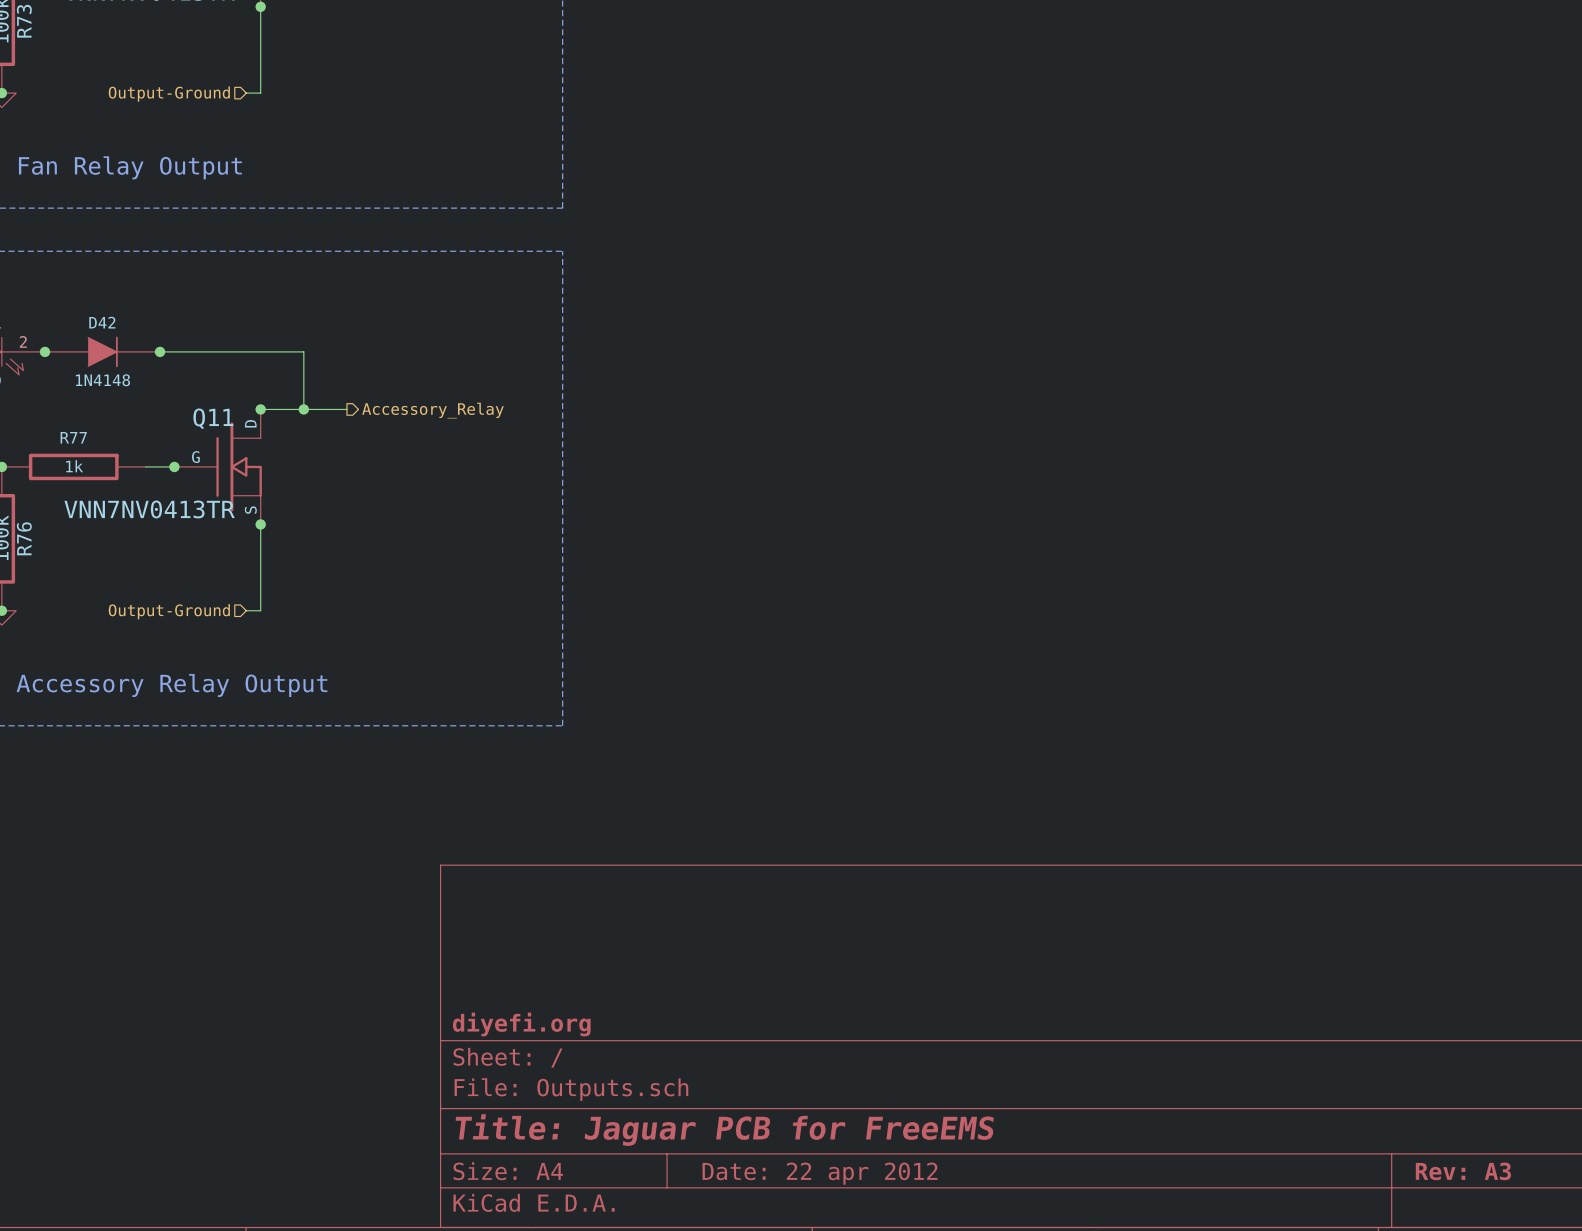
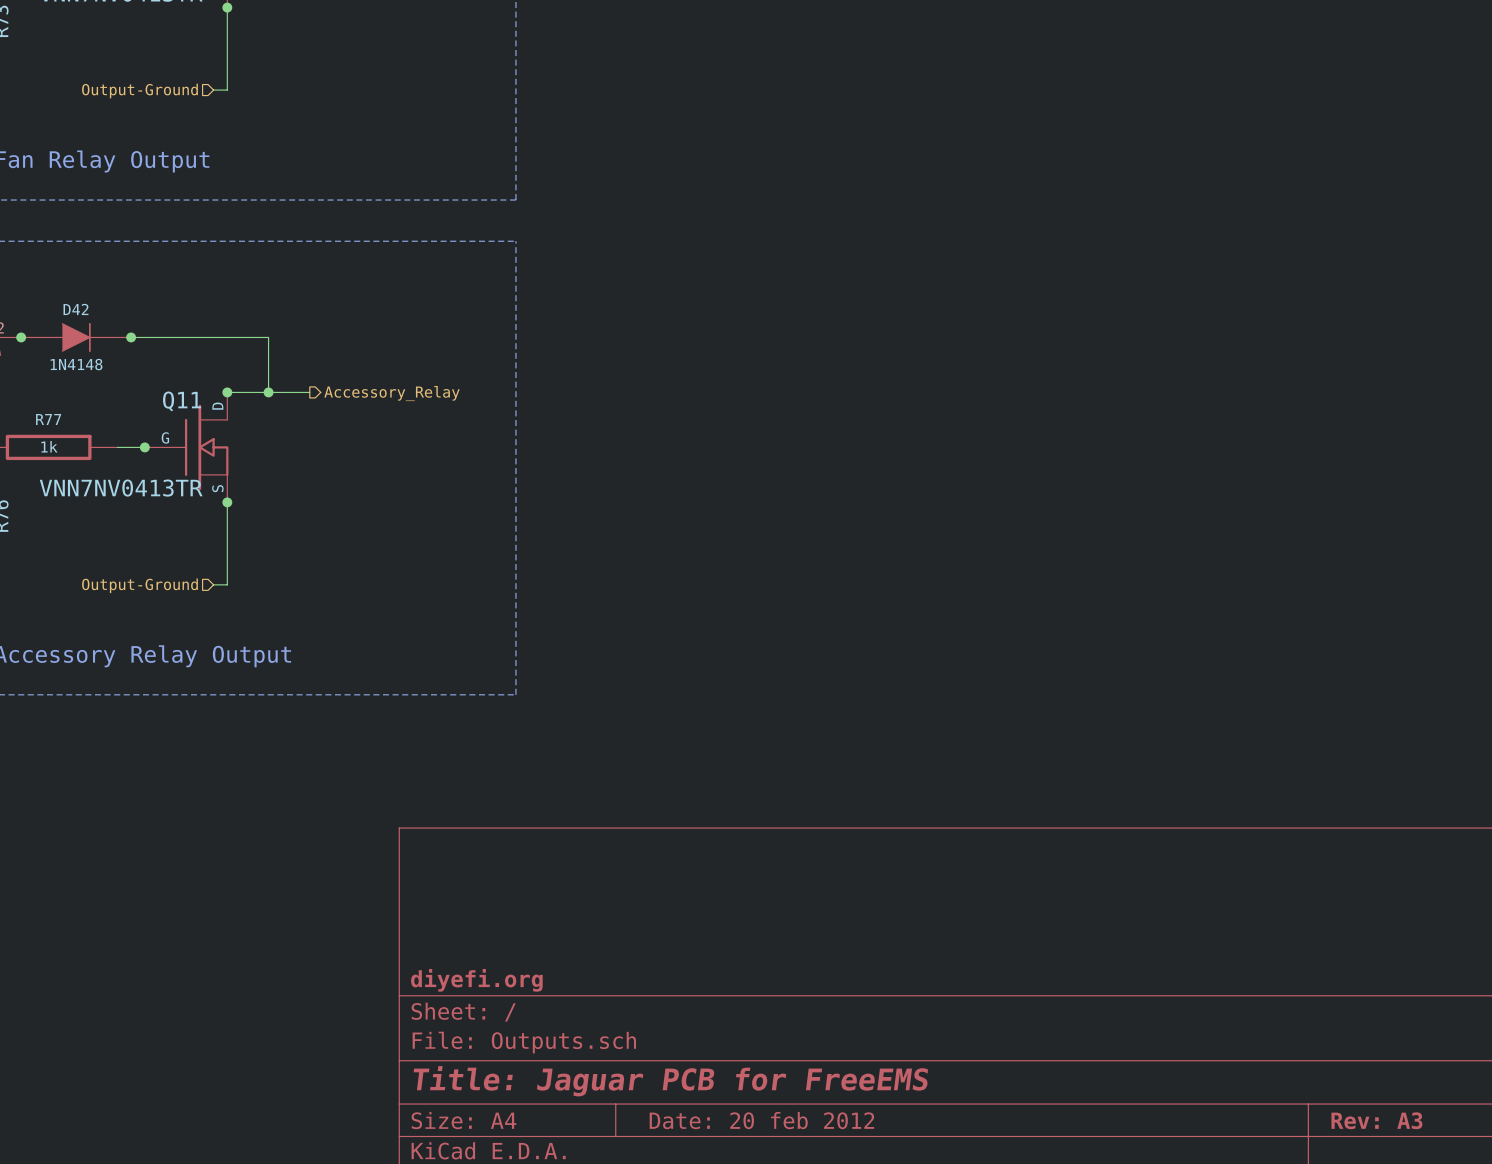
title block: Date: 22 apr 2012 (820, 1173) -> Date: 20 feb 2012 (761, 1120)

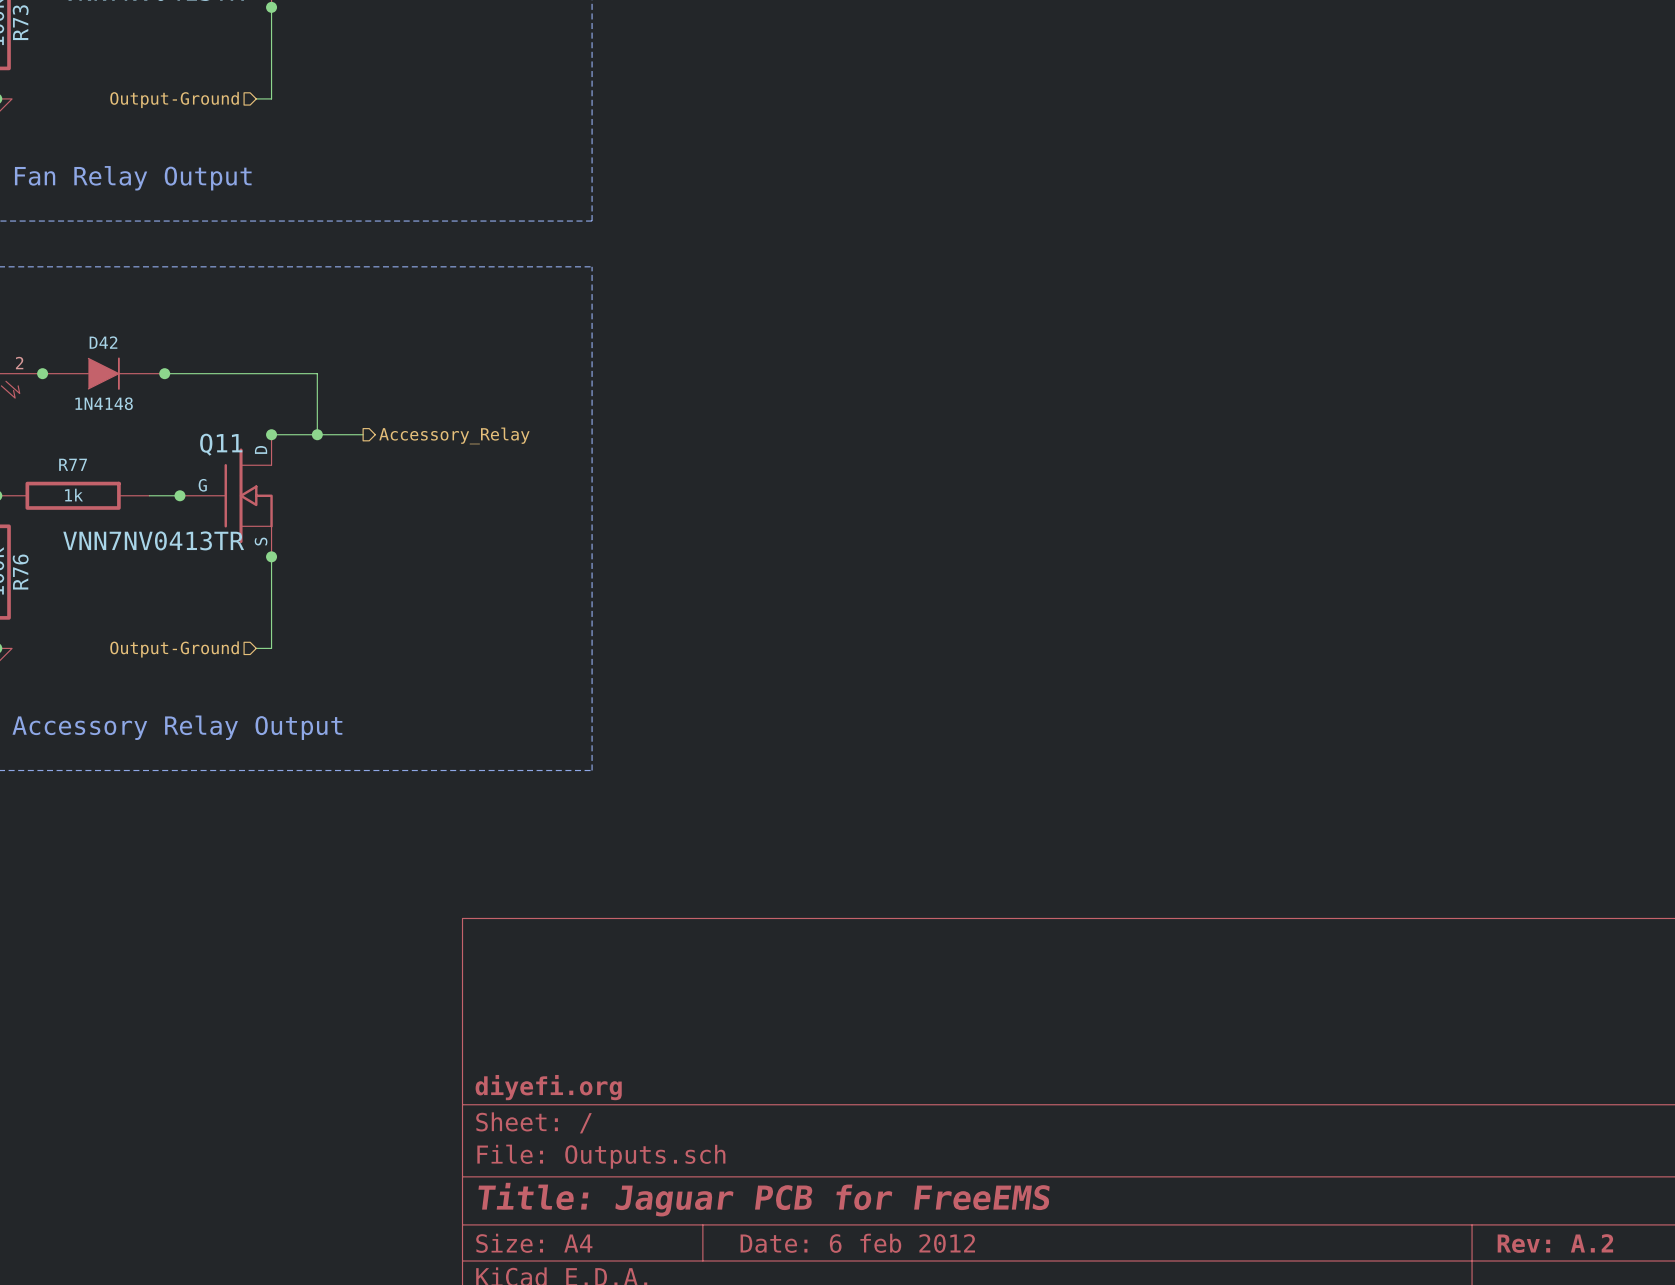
title block: Date: 20 feb 2012 (761, 1120) -> Date: 6 feb 2012 (857, 1243)
title block: Rev: A3 (1376, 1120) -> Rev: A.2 (1555, 1243)

